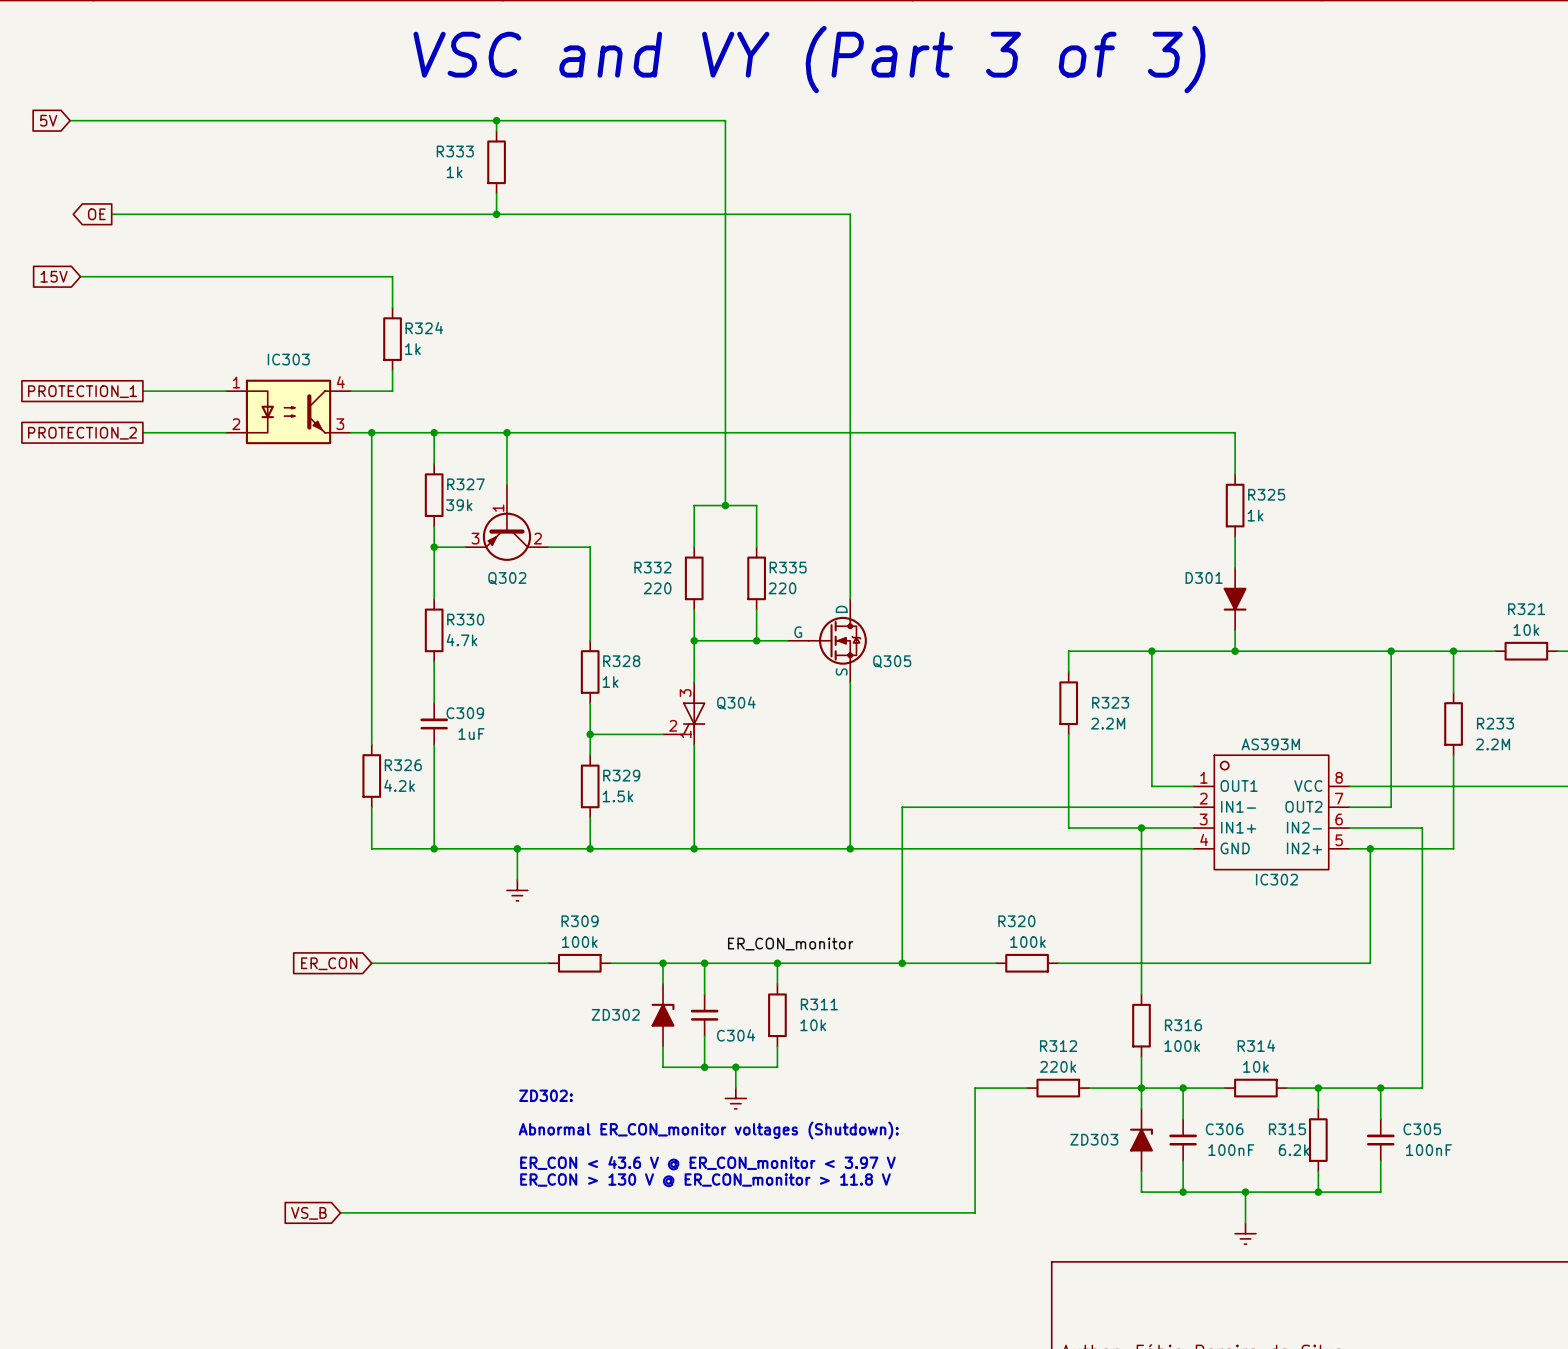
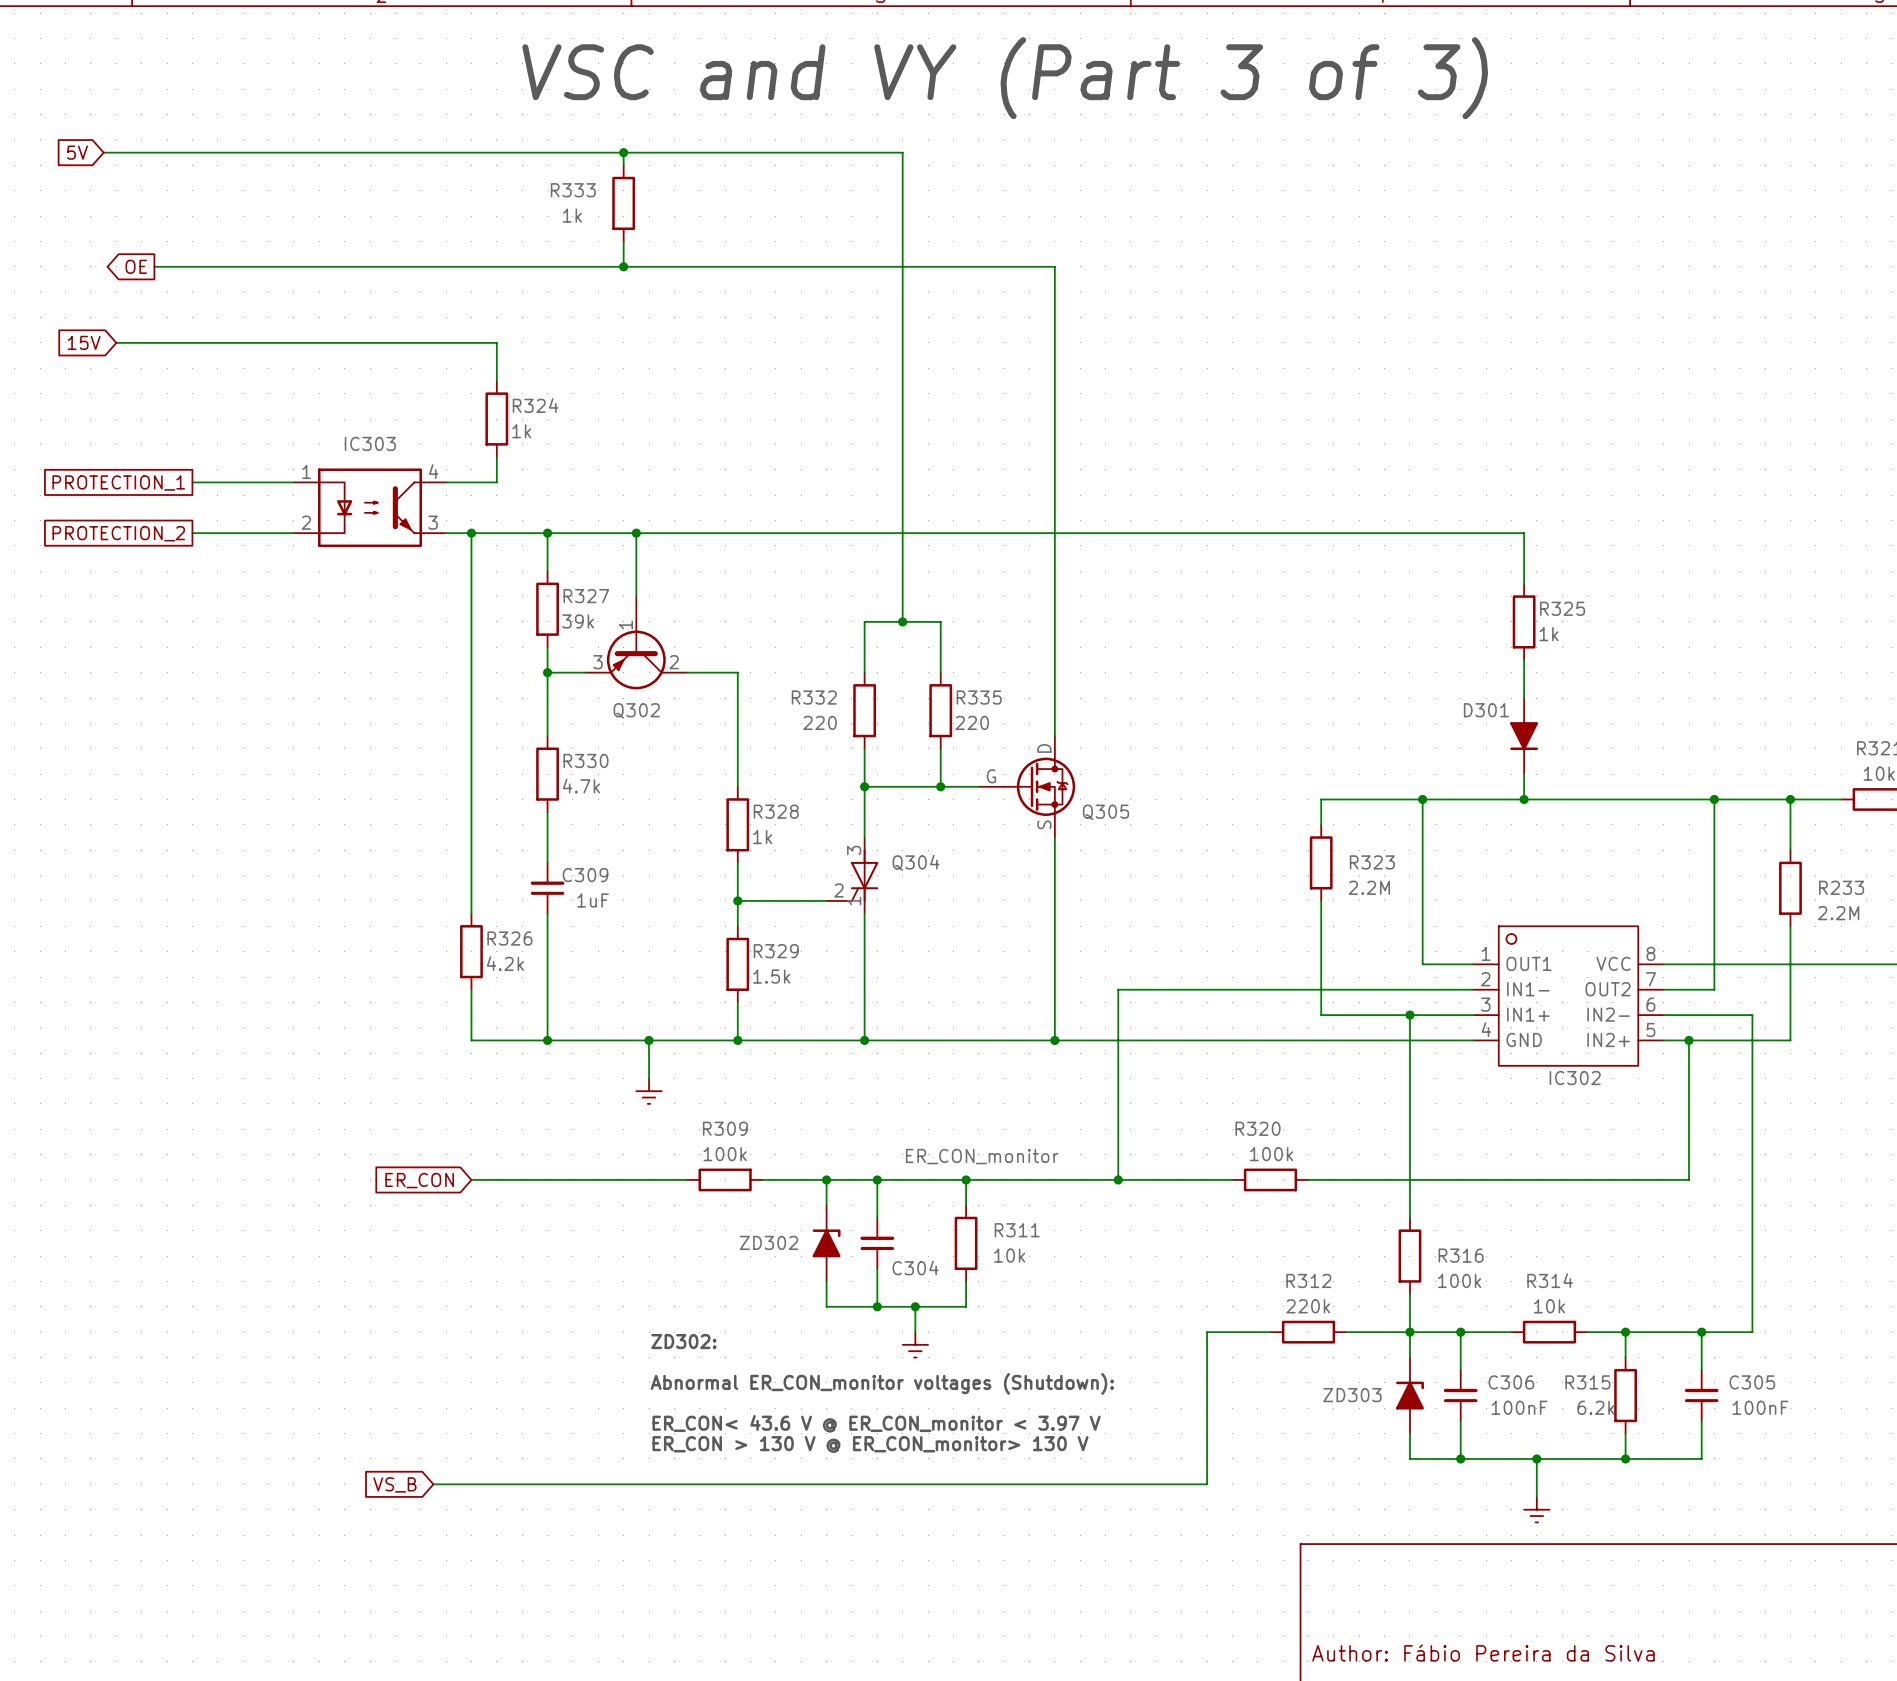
IC302 value: AS393M (1270, 744) -> none
text: ER_CON < 43.6 V @ ER_CON_monitor < 3.97 V (707, 1163) -> ER_CON< 43.6 V @ ER_CON_monitor < 3.97 V (876, 1423)
text: ER_CON > 130 V @ ER_CON_monitor > 11.8 V (705, 1180) -> ER_CON > 130 V @ ER_CON_monitor> 130 V (870, 1444)

